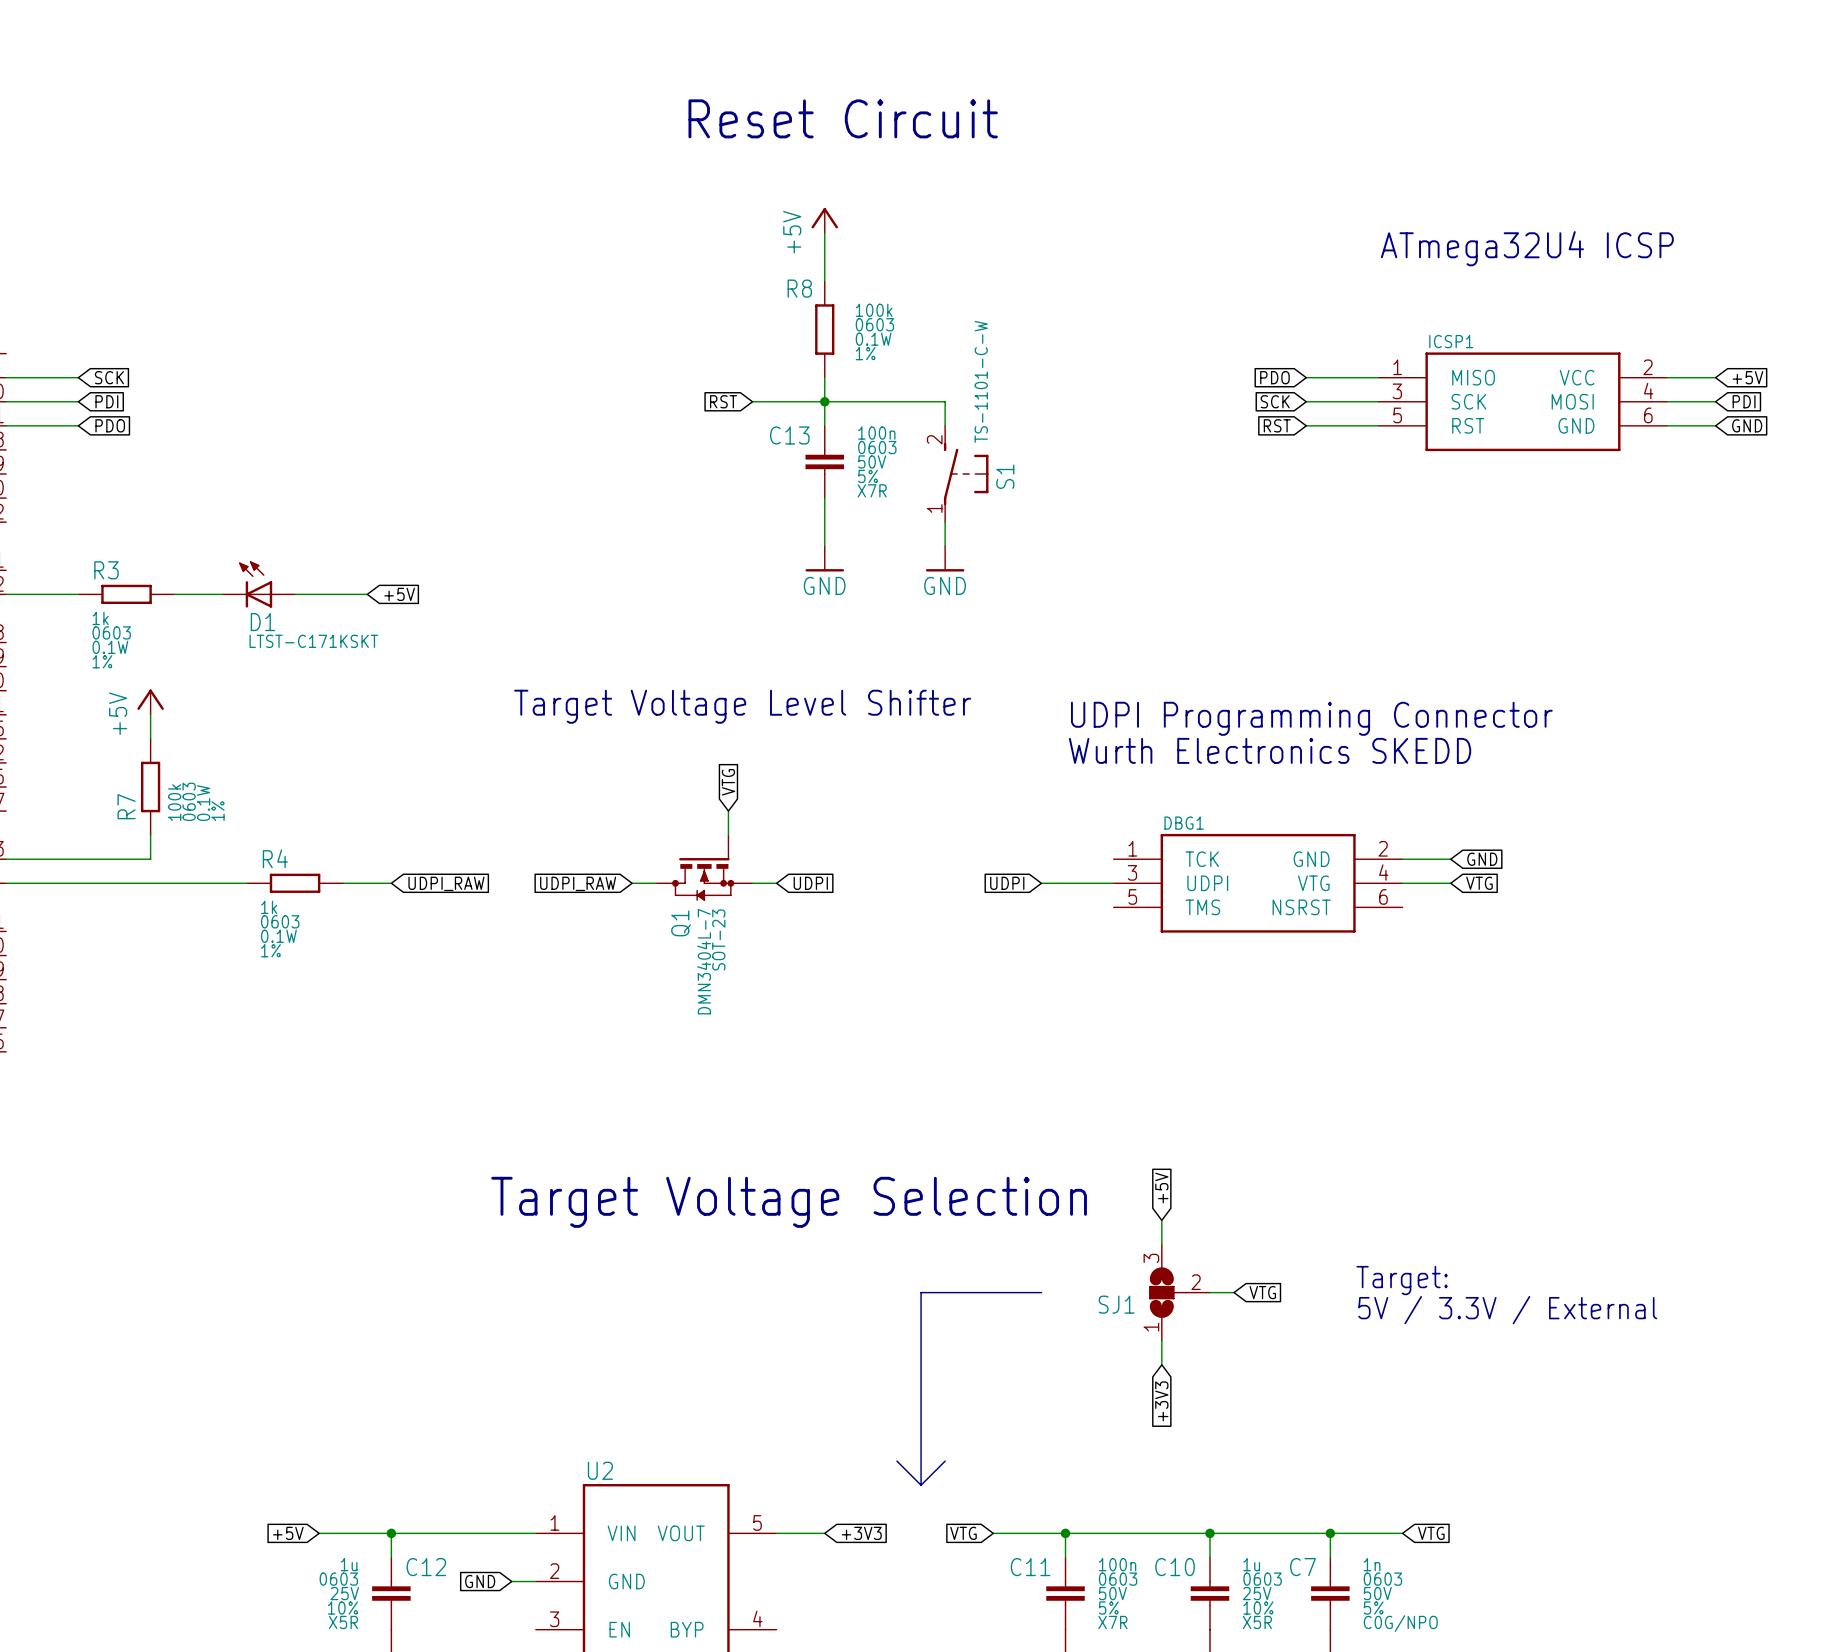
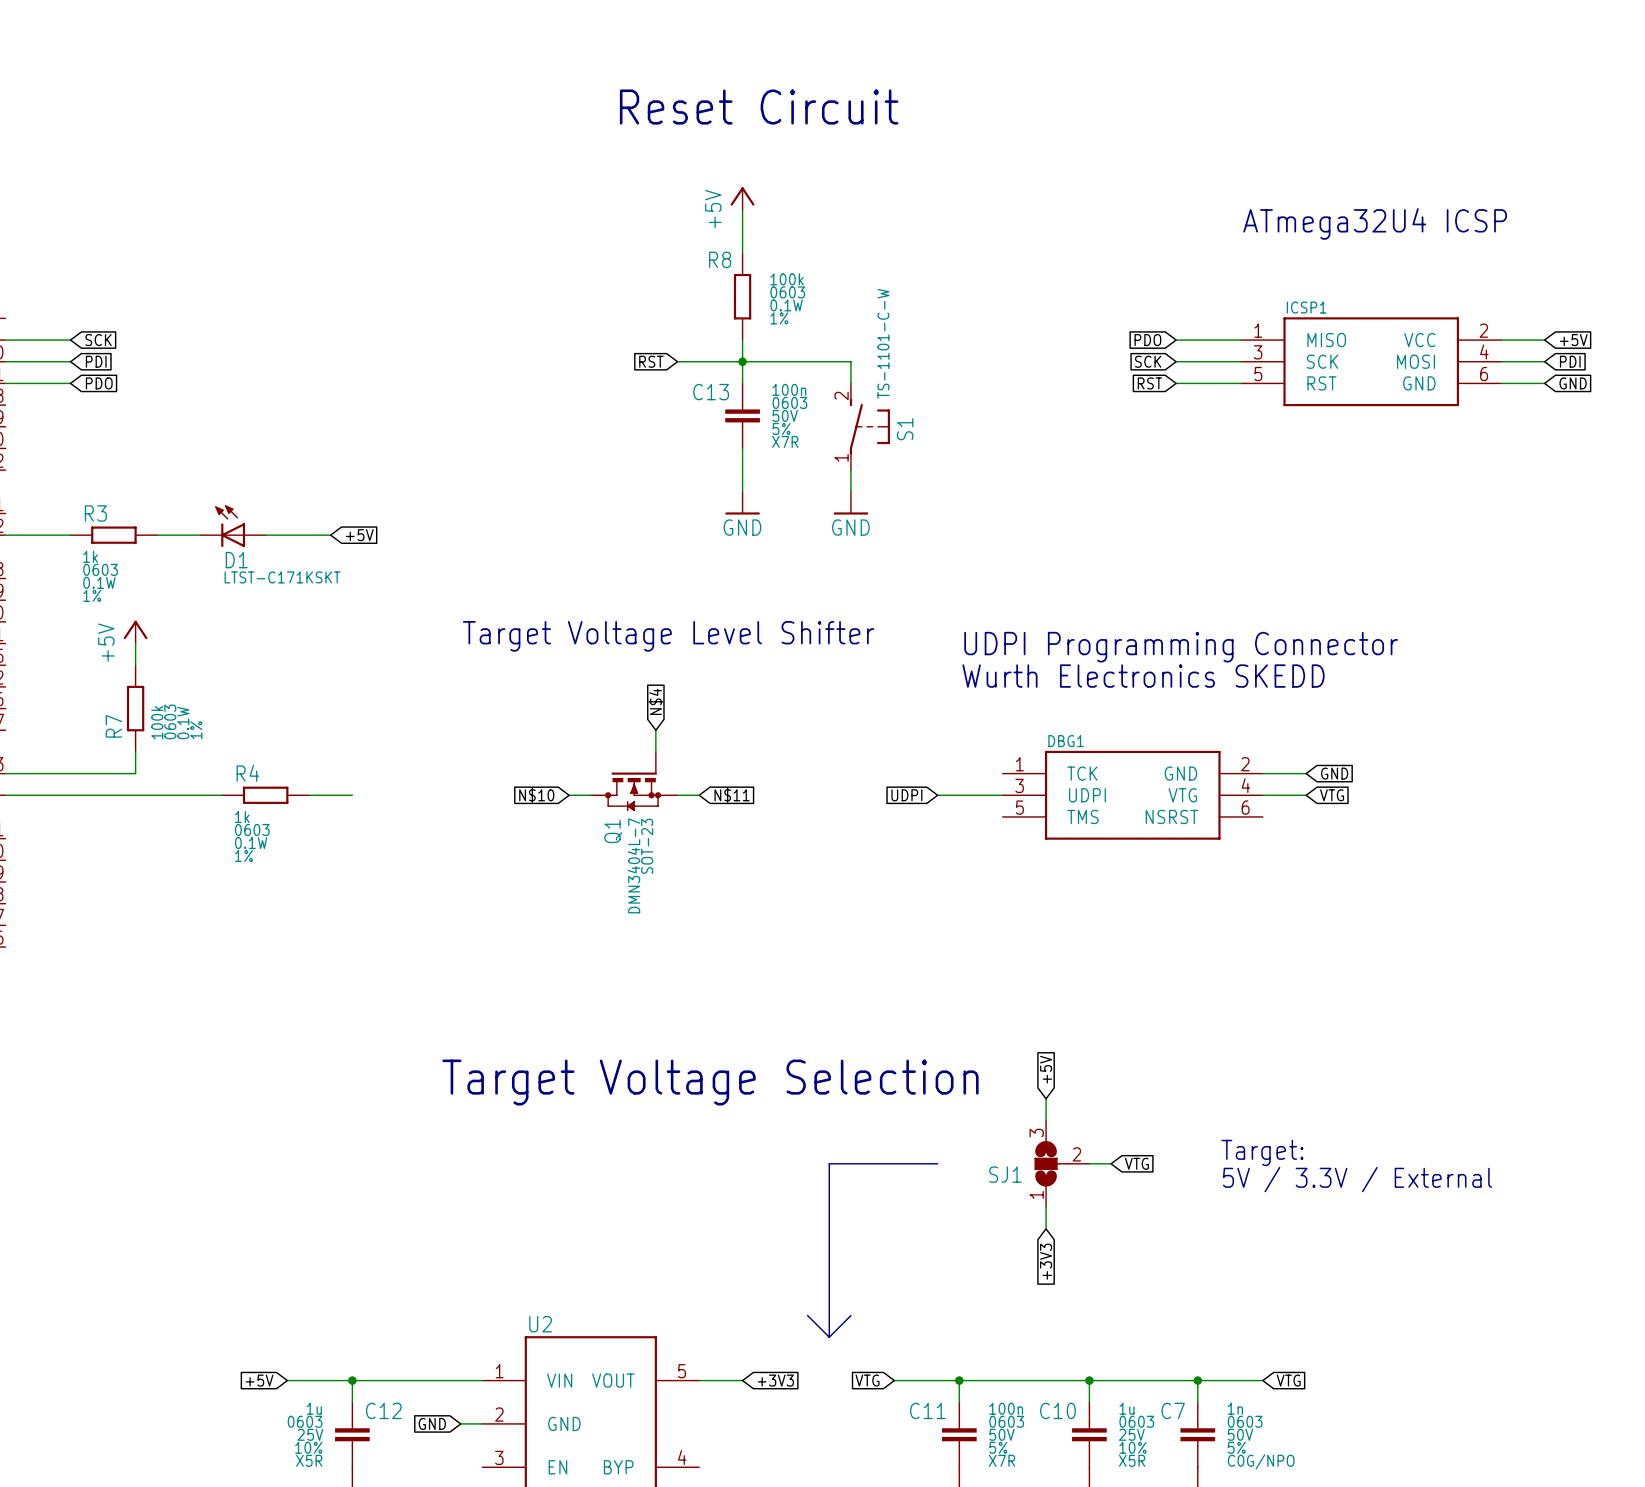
global label: VTG (728, 782) -> N$4 (655, 701)
global label: UDPI_RAW (446, 883) -> none
global label: UDPI_RAW (578, 883) -> N$10 (536, 795)
global label: UDPI (810, 883) -> N$11 (732, 795)

